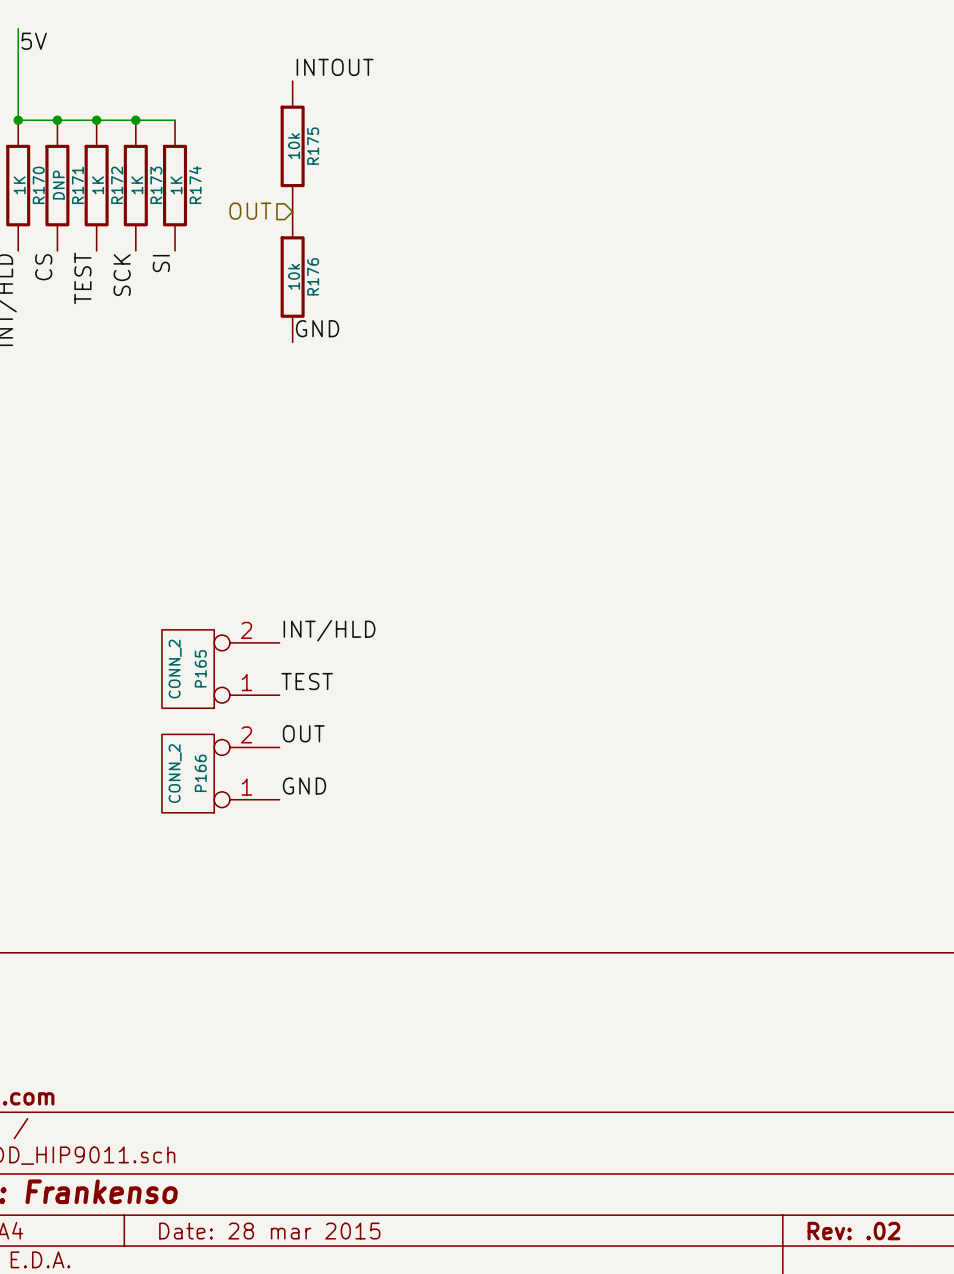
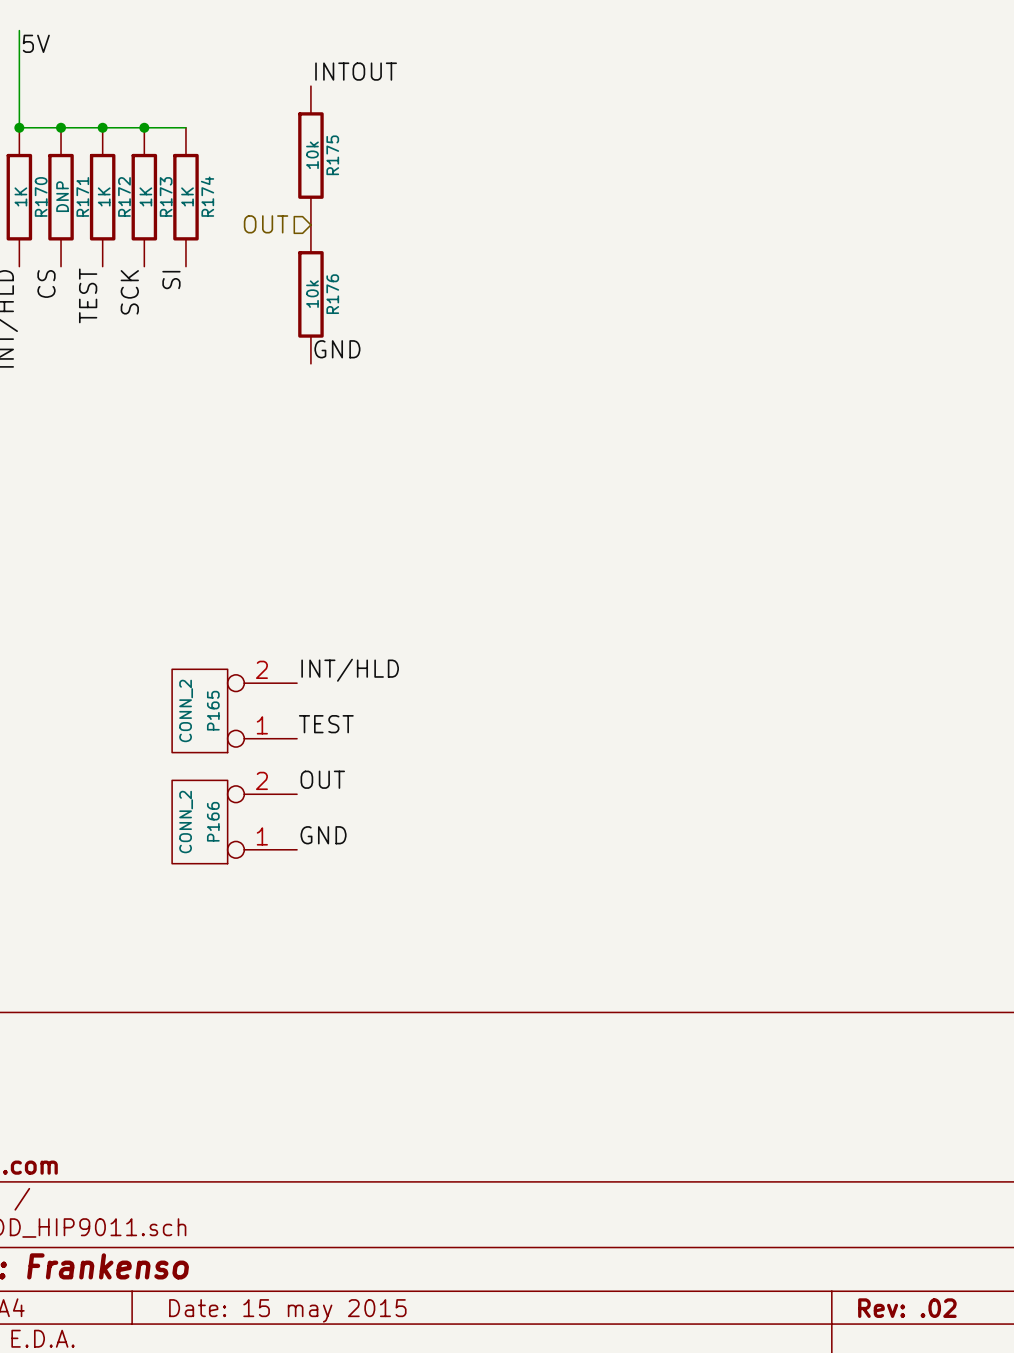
title block: Date: 28 mar 2015 (269, 1231) -> Date: 15 may 2015 (287, 1310)

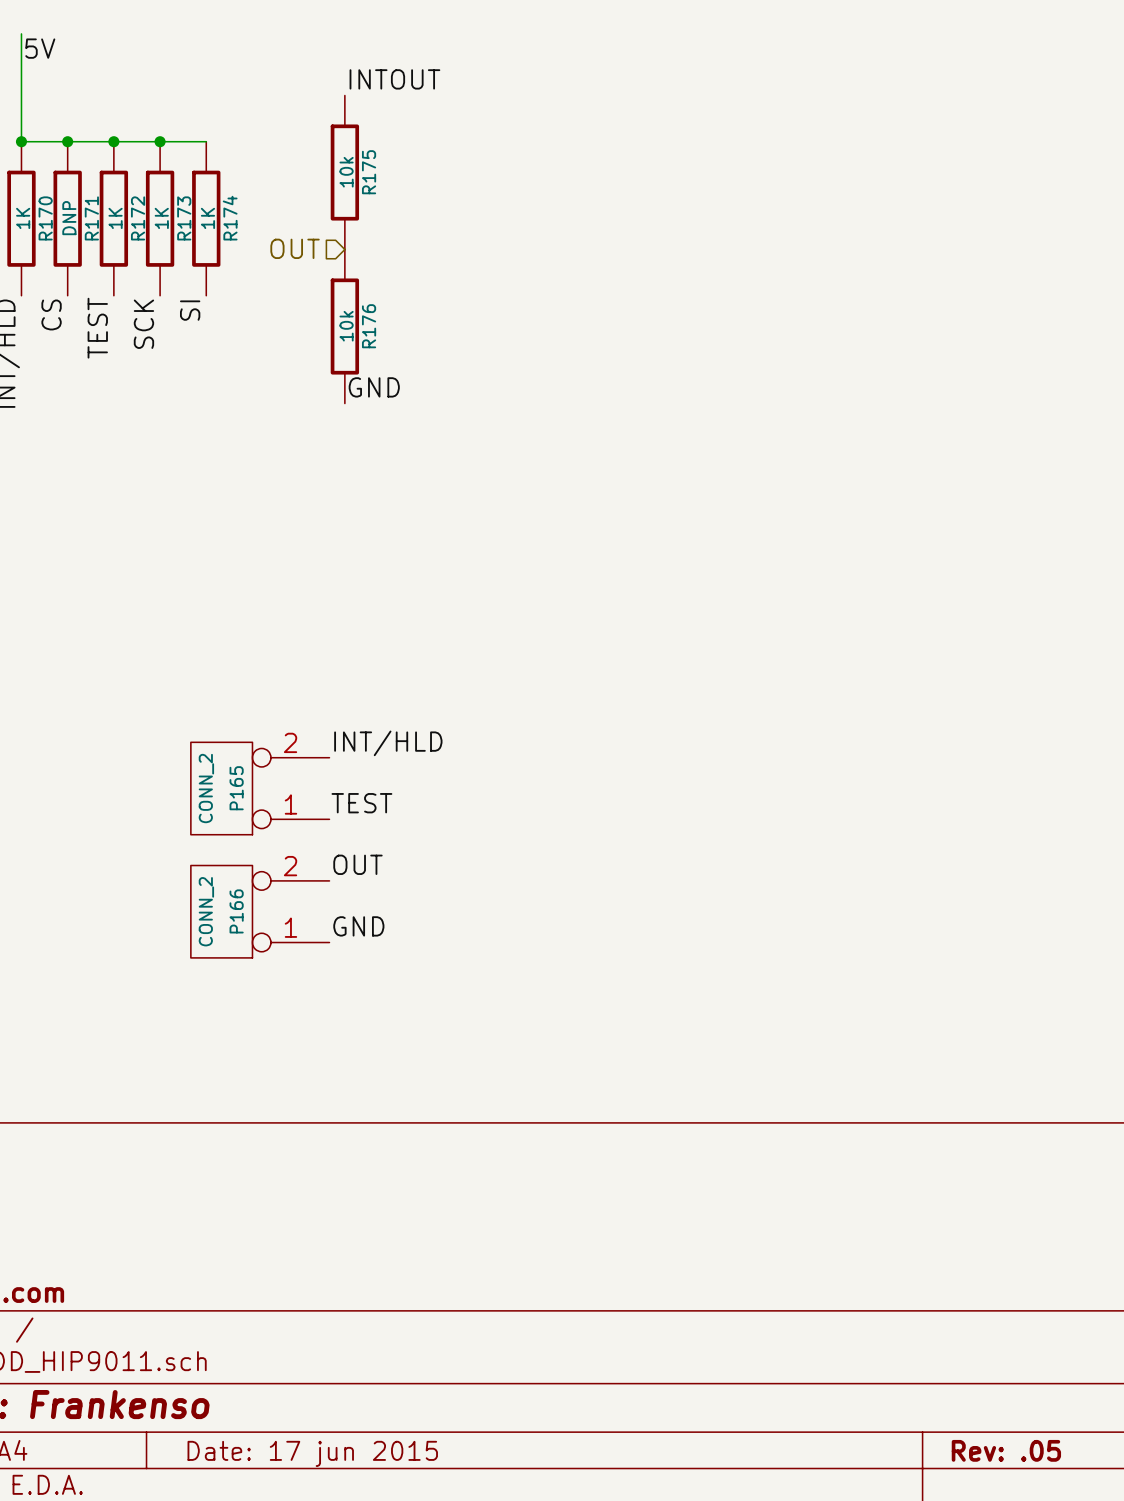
title block: Rev: .02 (907, 1308) -> Rev: .05 (1006, 1450)
title block: Date: 15 may 2015 (287, 1310) -> Date: 17 jun 2015 (312, 1453)

